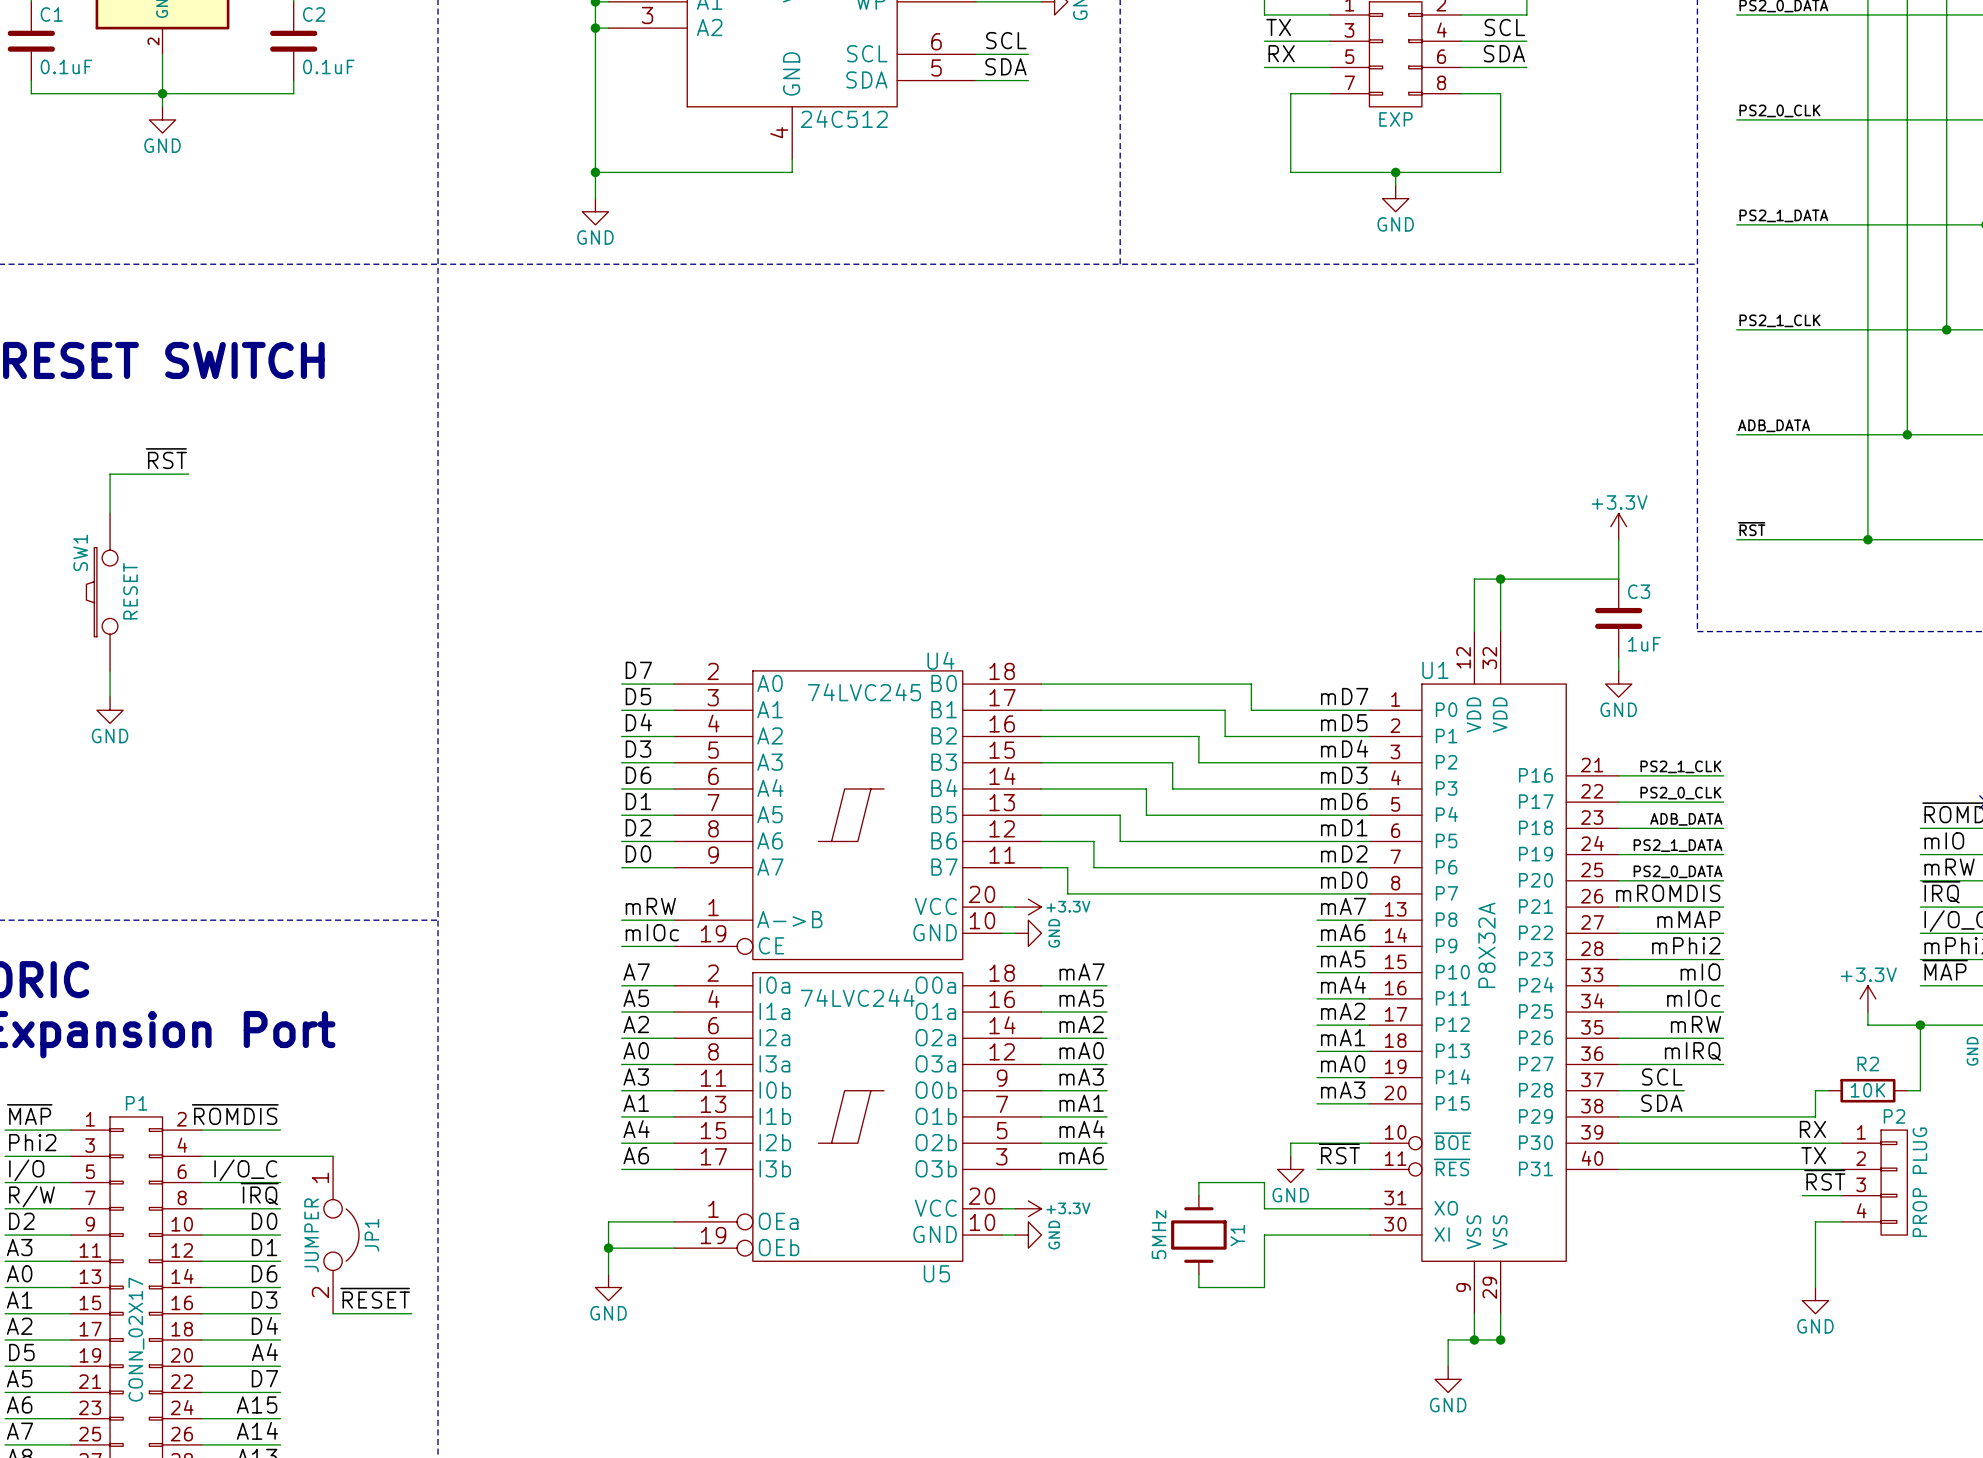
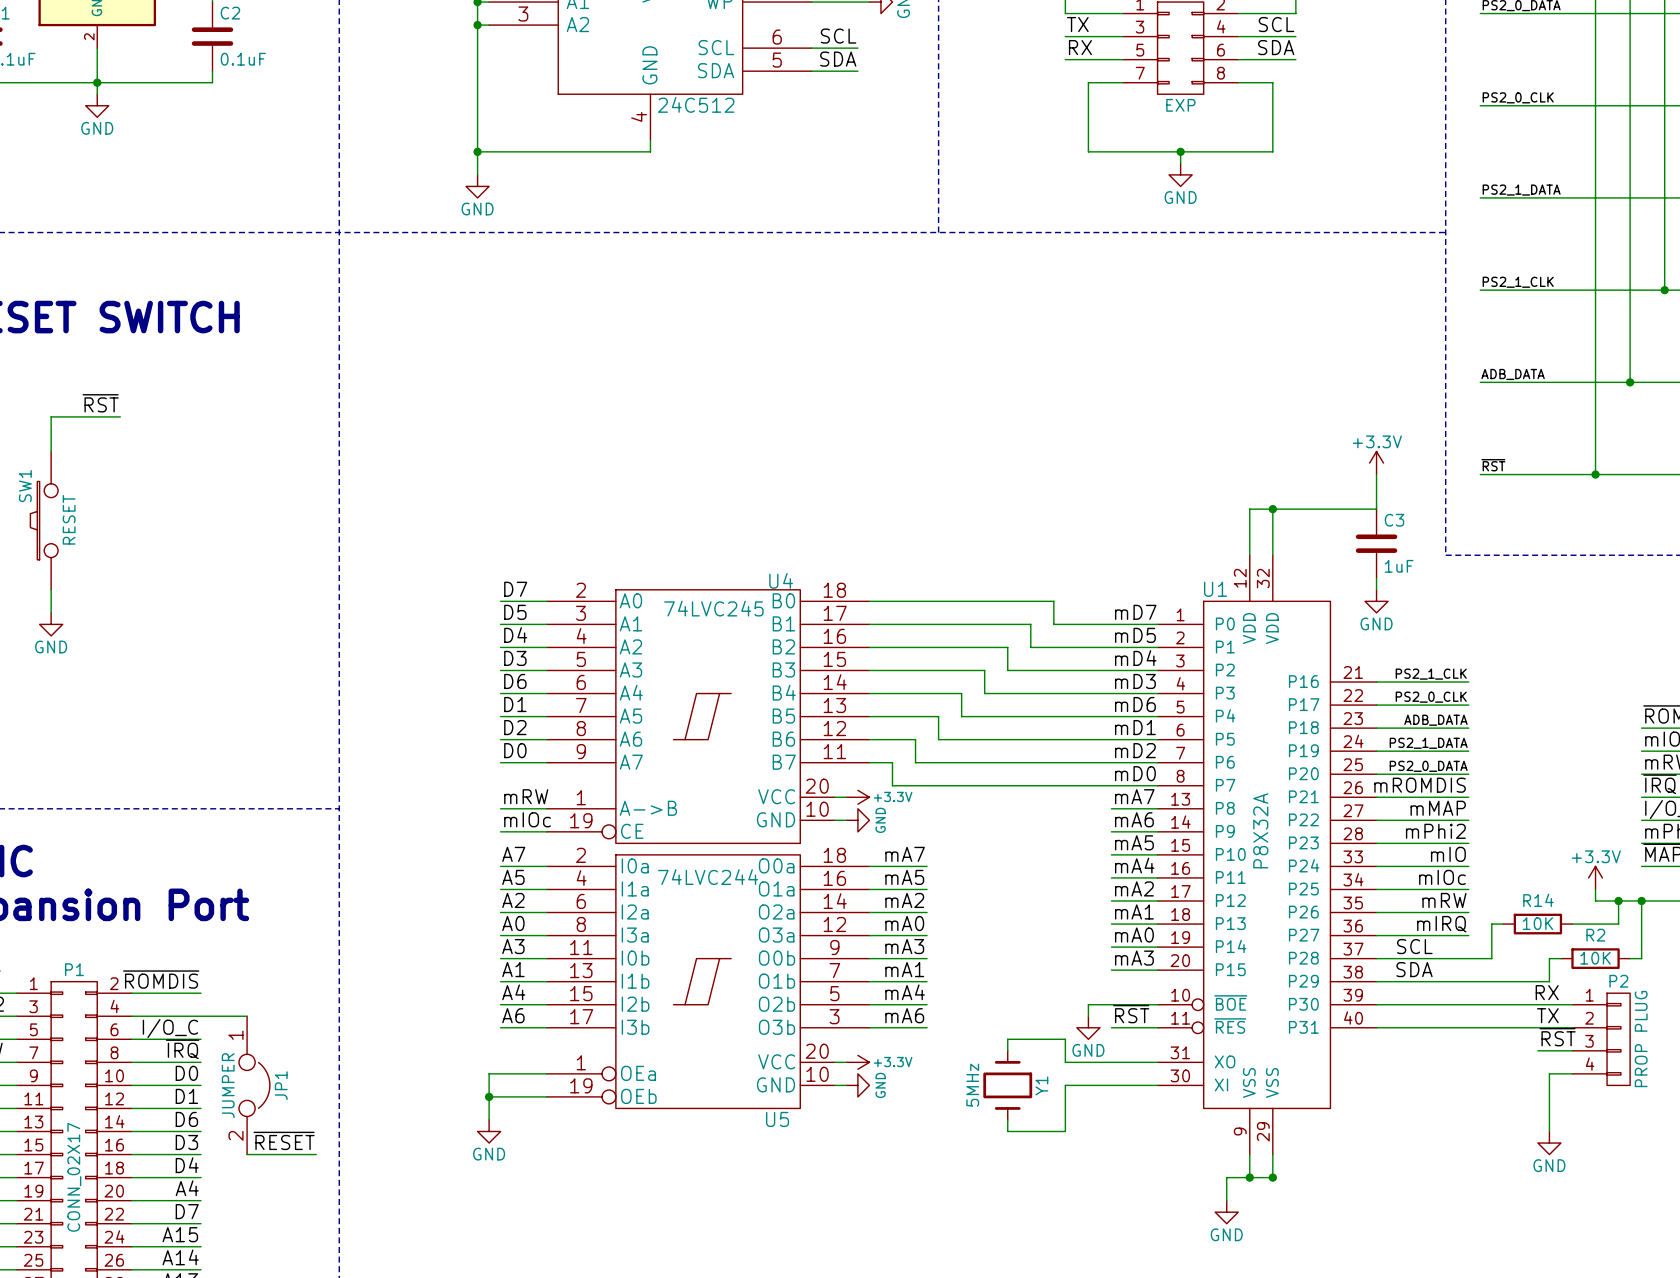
wire: none -> (1618, 900) (1618, 924) (1572, 924)
junction: none -> (1618, 900)
wire: none -> (1503, 924) (1491, 924) (1491, 958) (1434, 958)
R14: none -> 10K (1537, 924)

